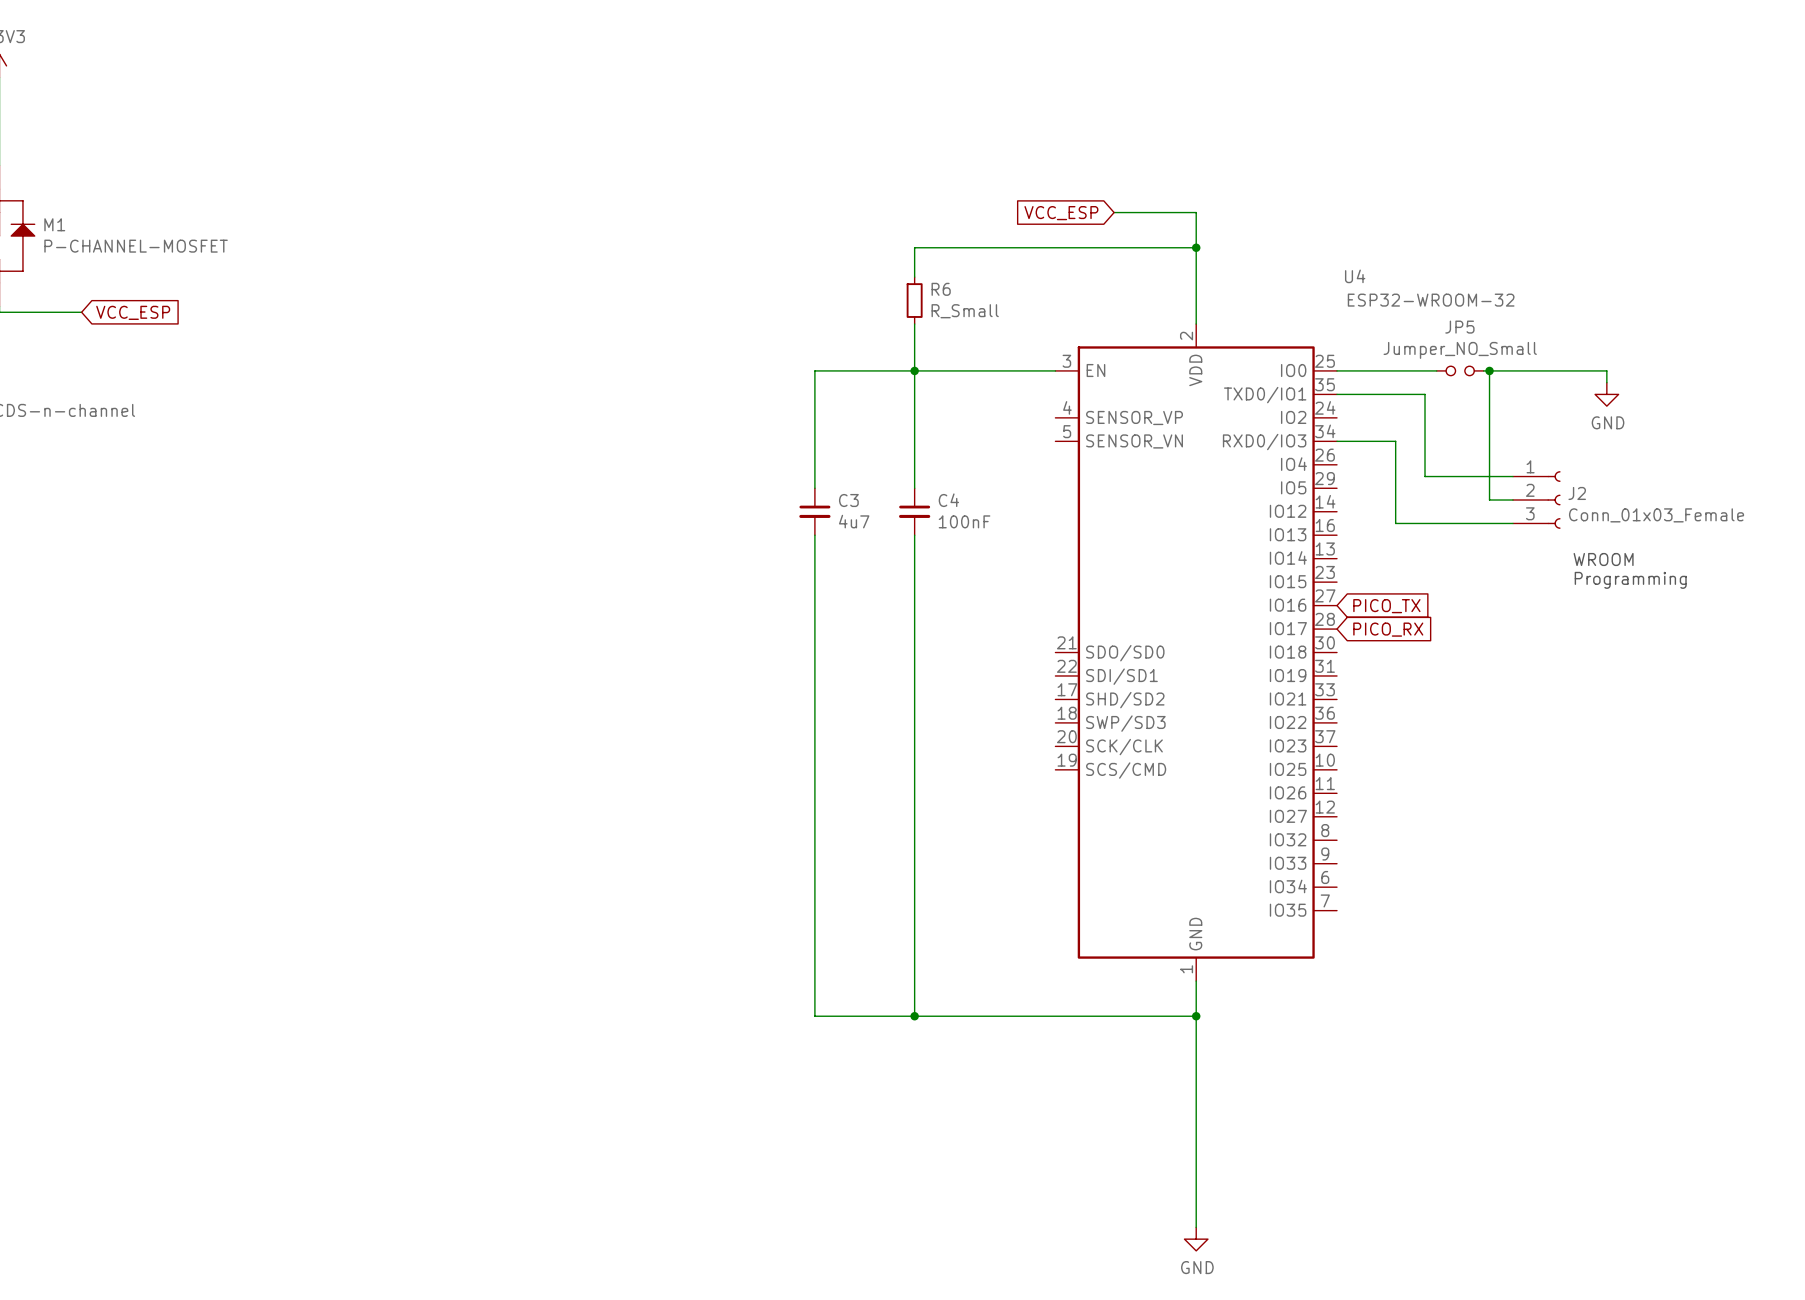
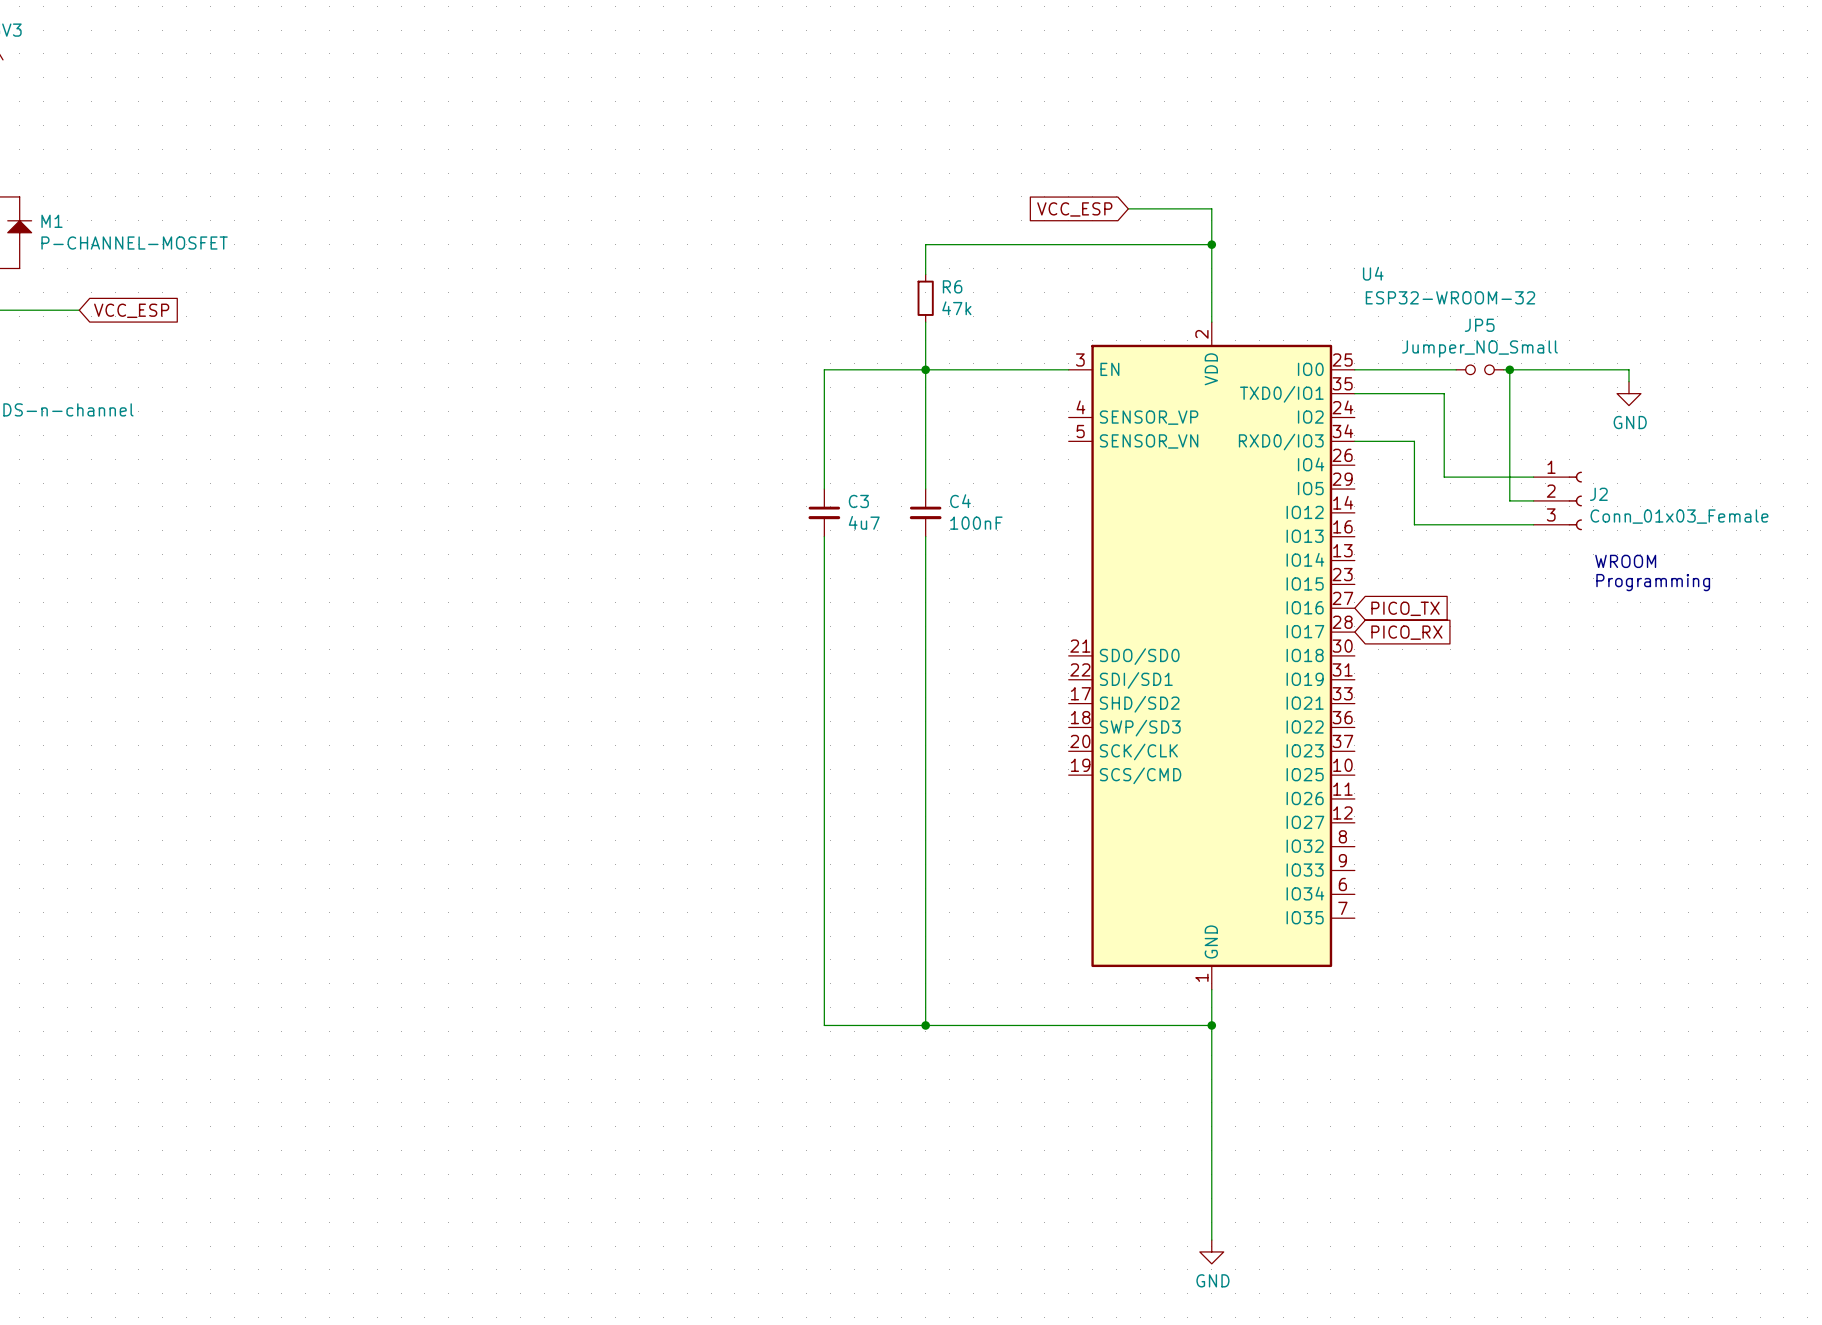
R6 value: R_Small (965, 311) -> 47k (956, 308)

